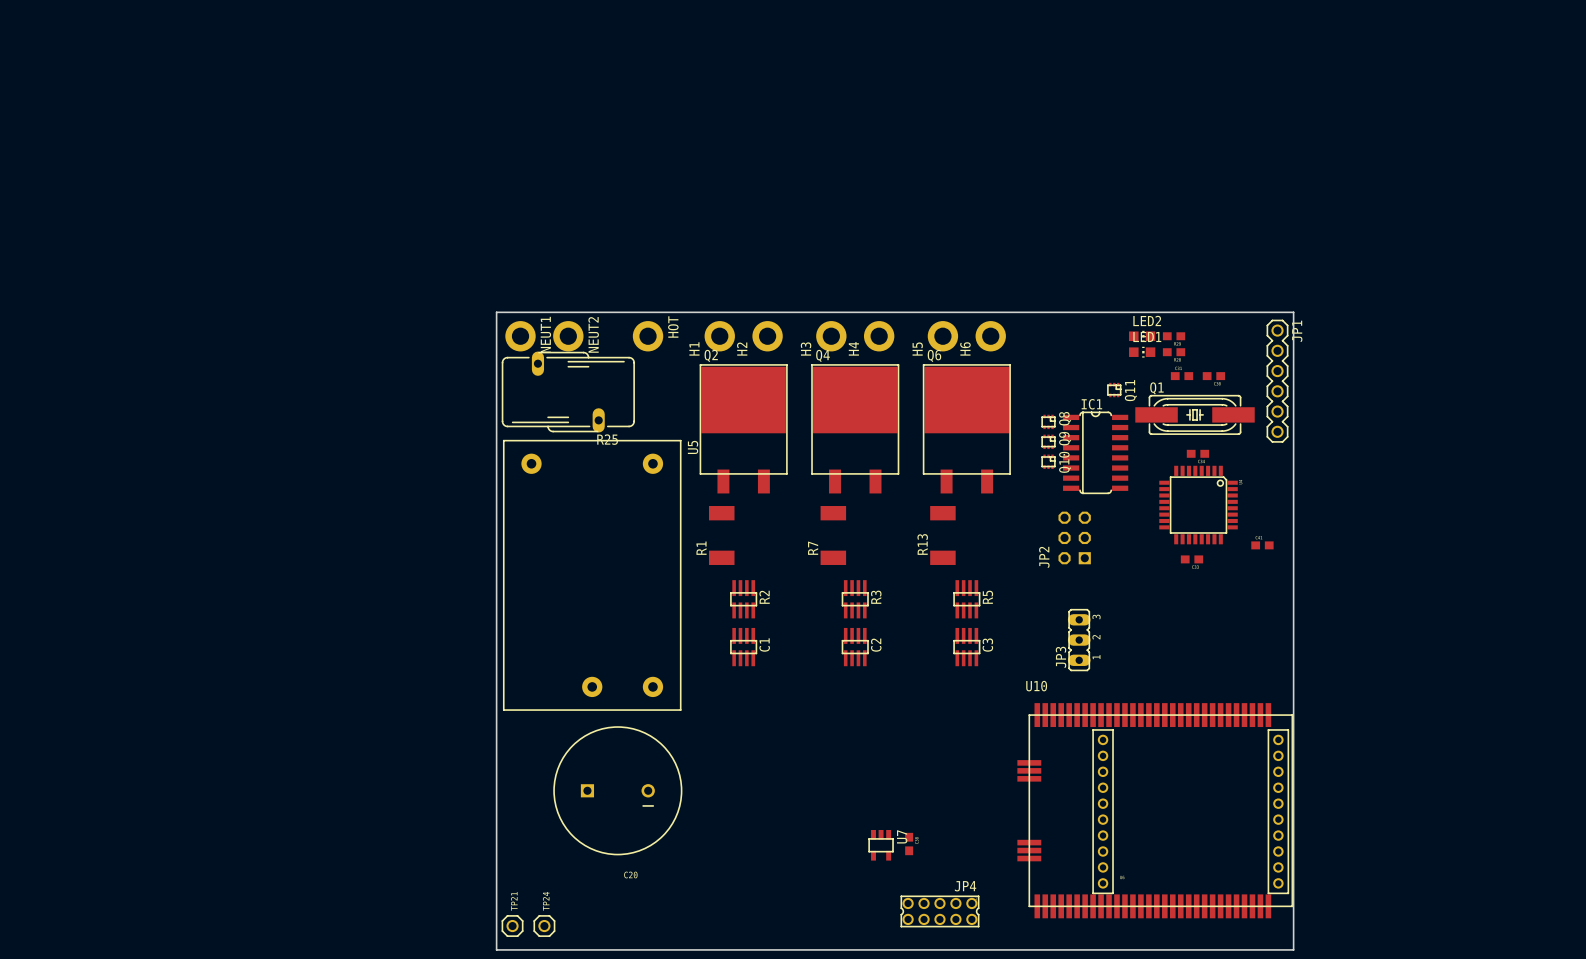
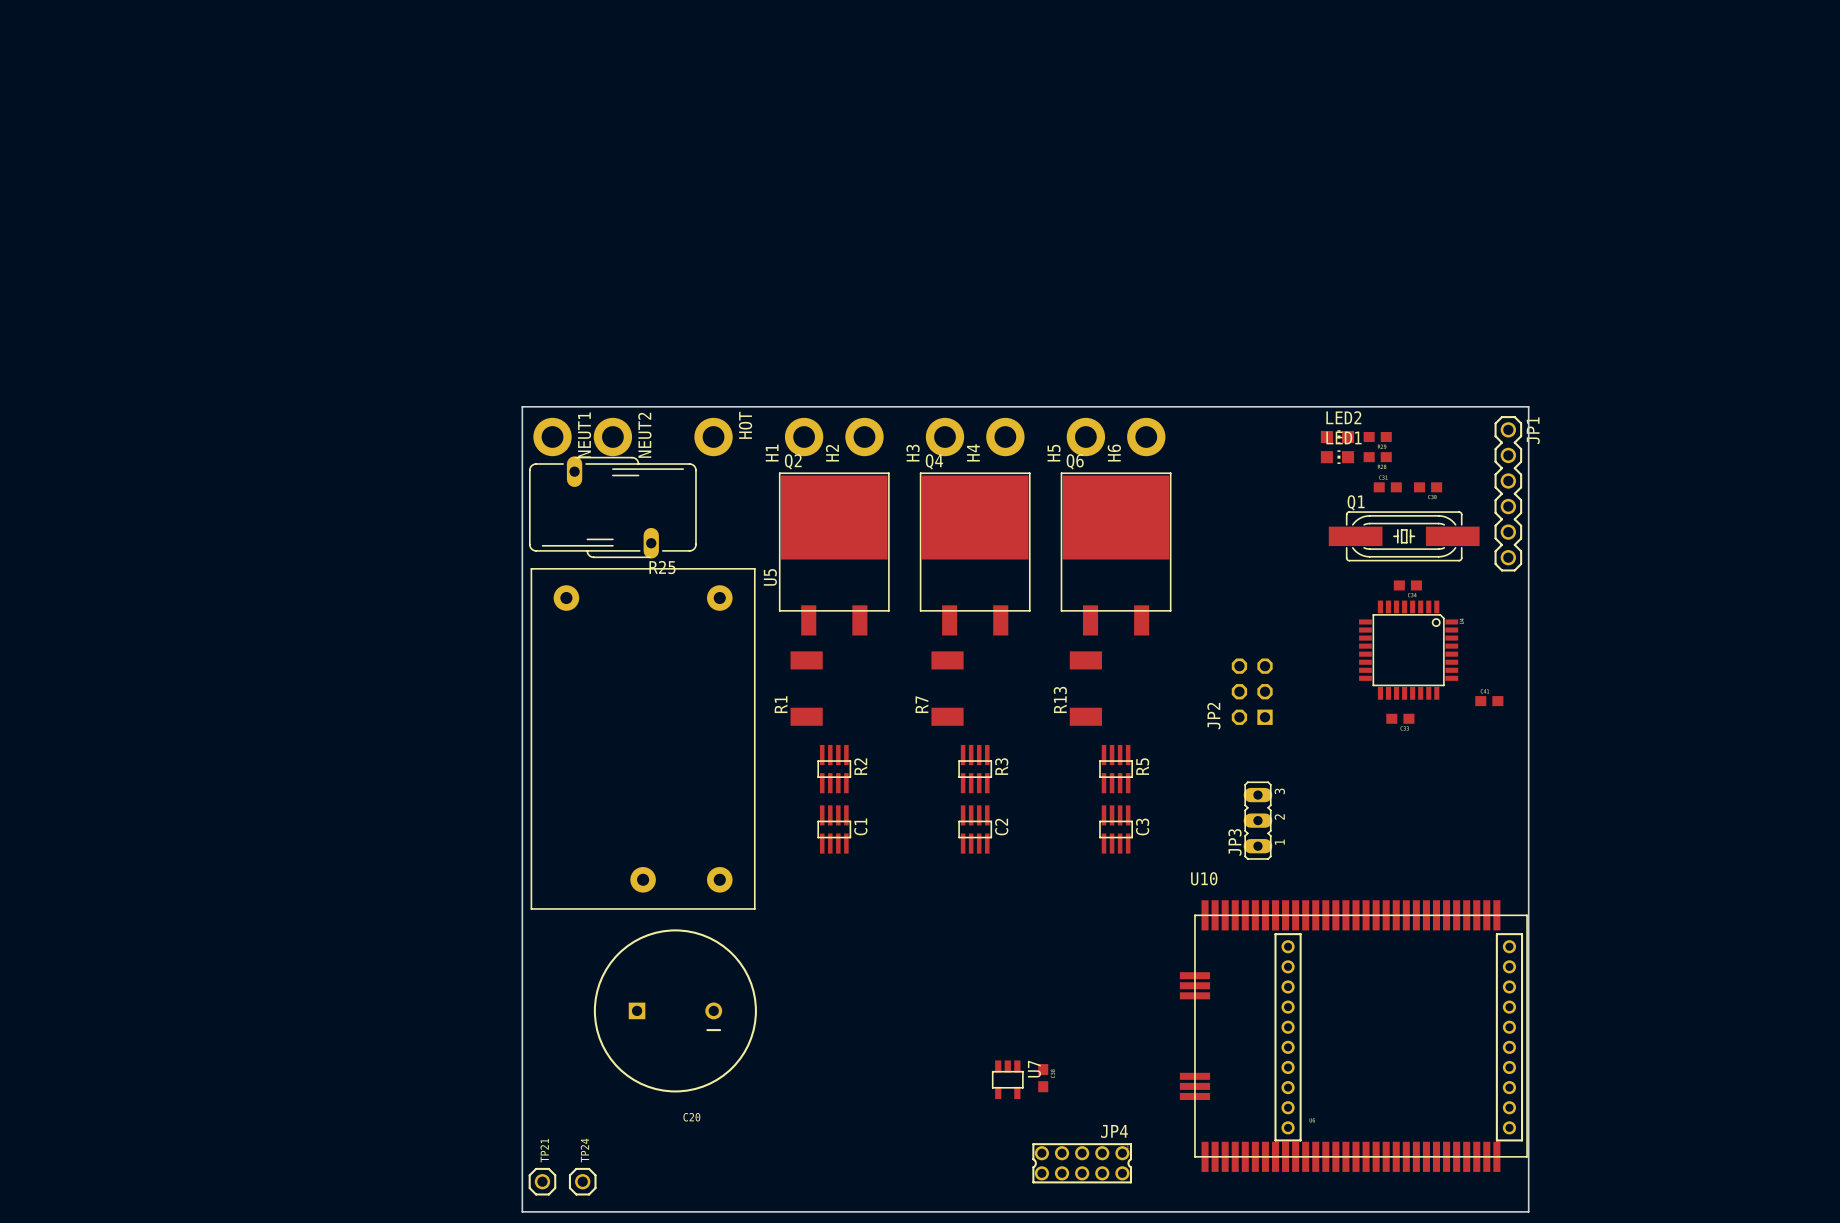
Q11: (1114, 390) -> none
Q8: (1048, 421) -> none
Q9: (1048, 441) -> none
IC1: (1095, 452) -> none
Q10: (1048, 461) -> none

